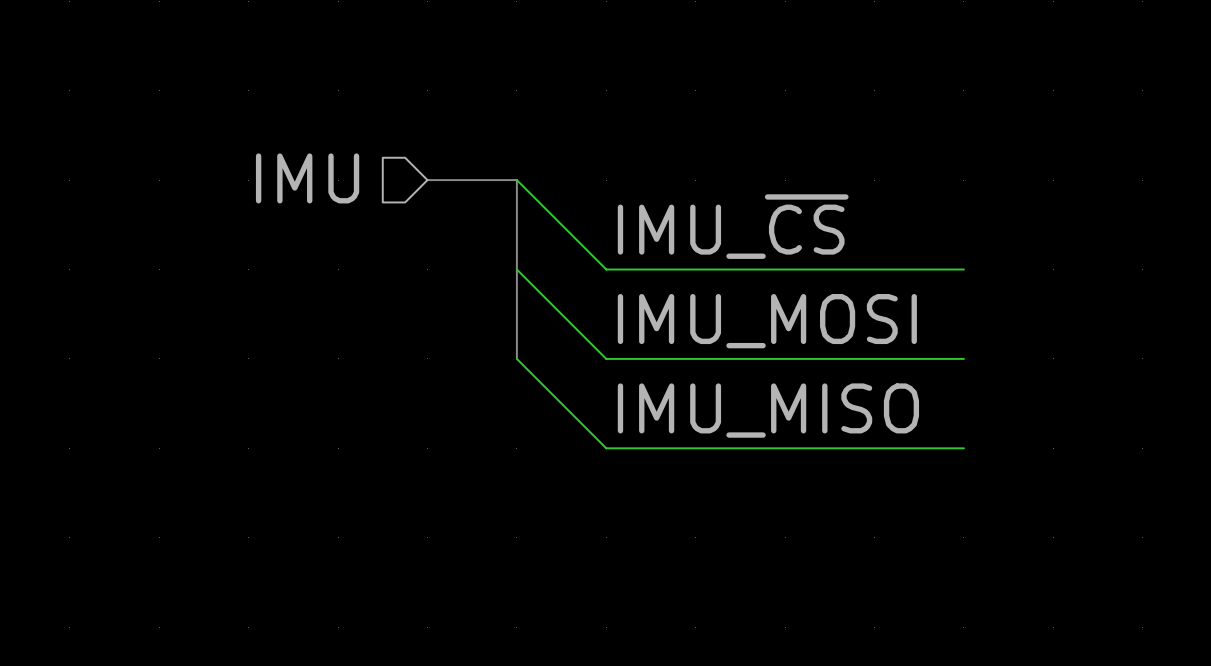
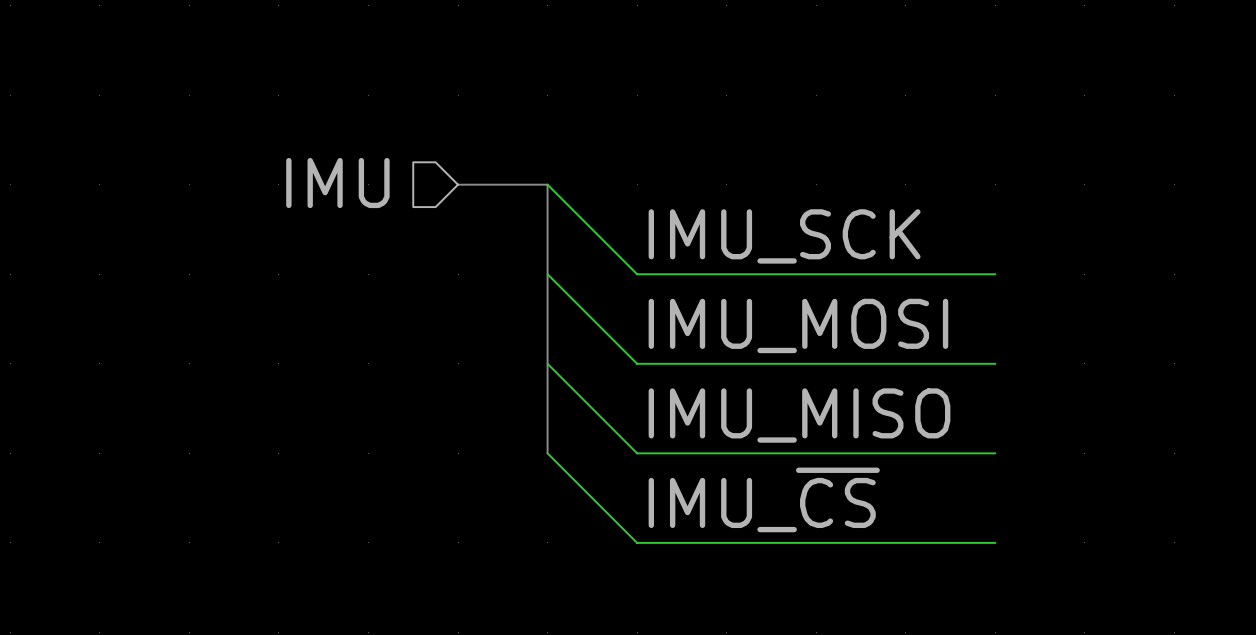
label: IMU_~{CS} (733, 226) -> IMU_SCK (784, 236)
bus: none -> (547, 363) (547, 453)
wire: none -> (547, 453) (637, 542) (995, 542)
label: none -> IMU_~{CS} (764, 499)

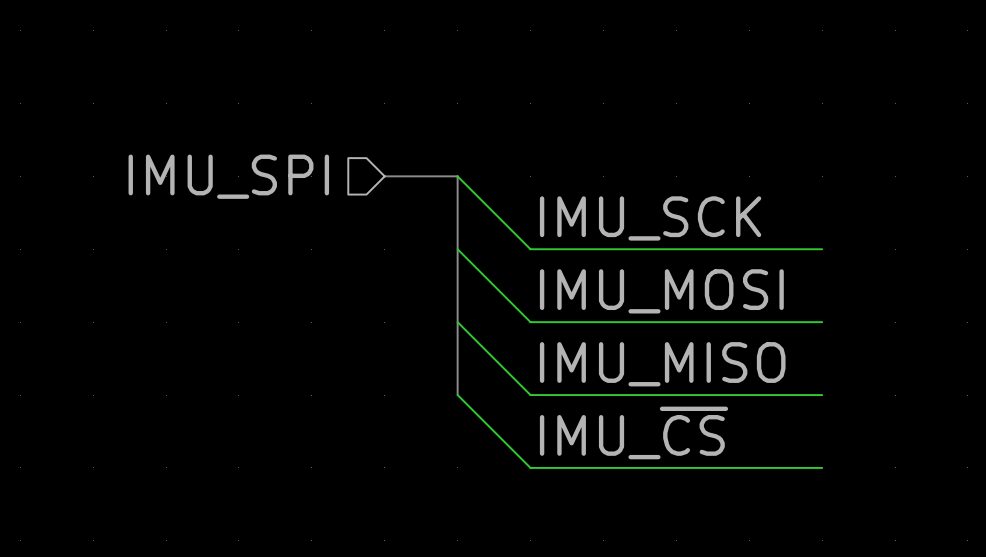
hierarchical label: IMU (337, 183) -> IMU_SPI (228, 176)

